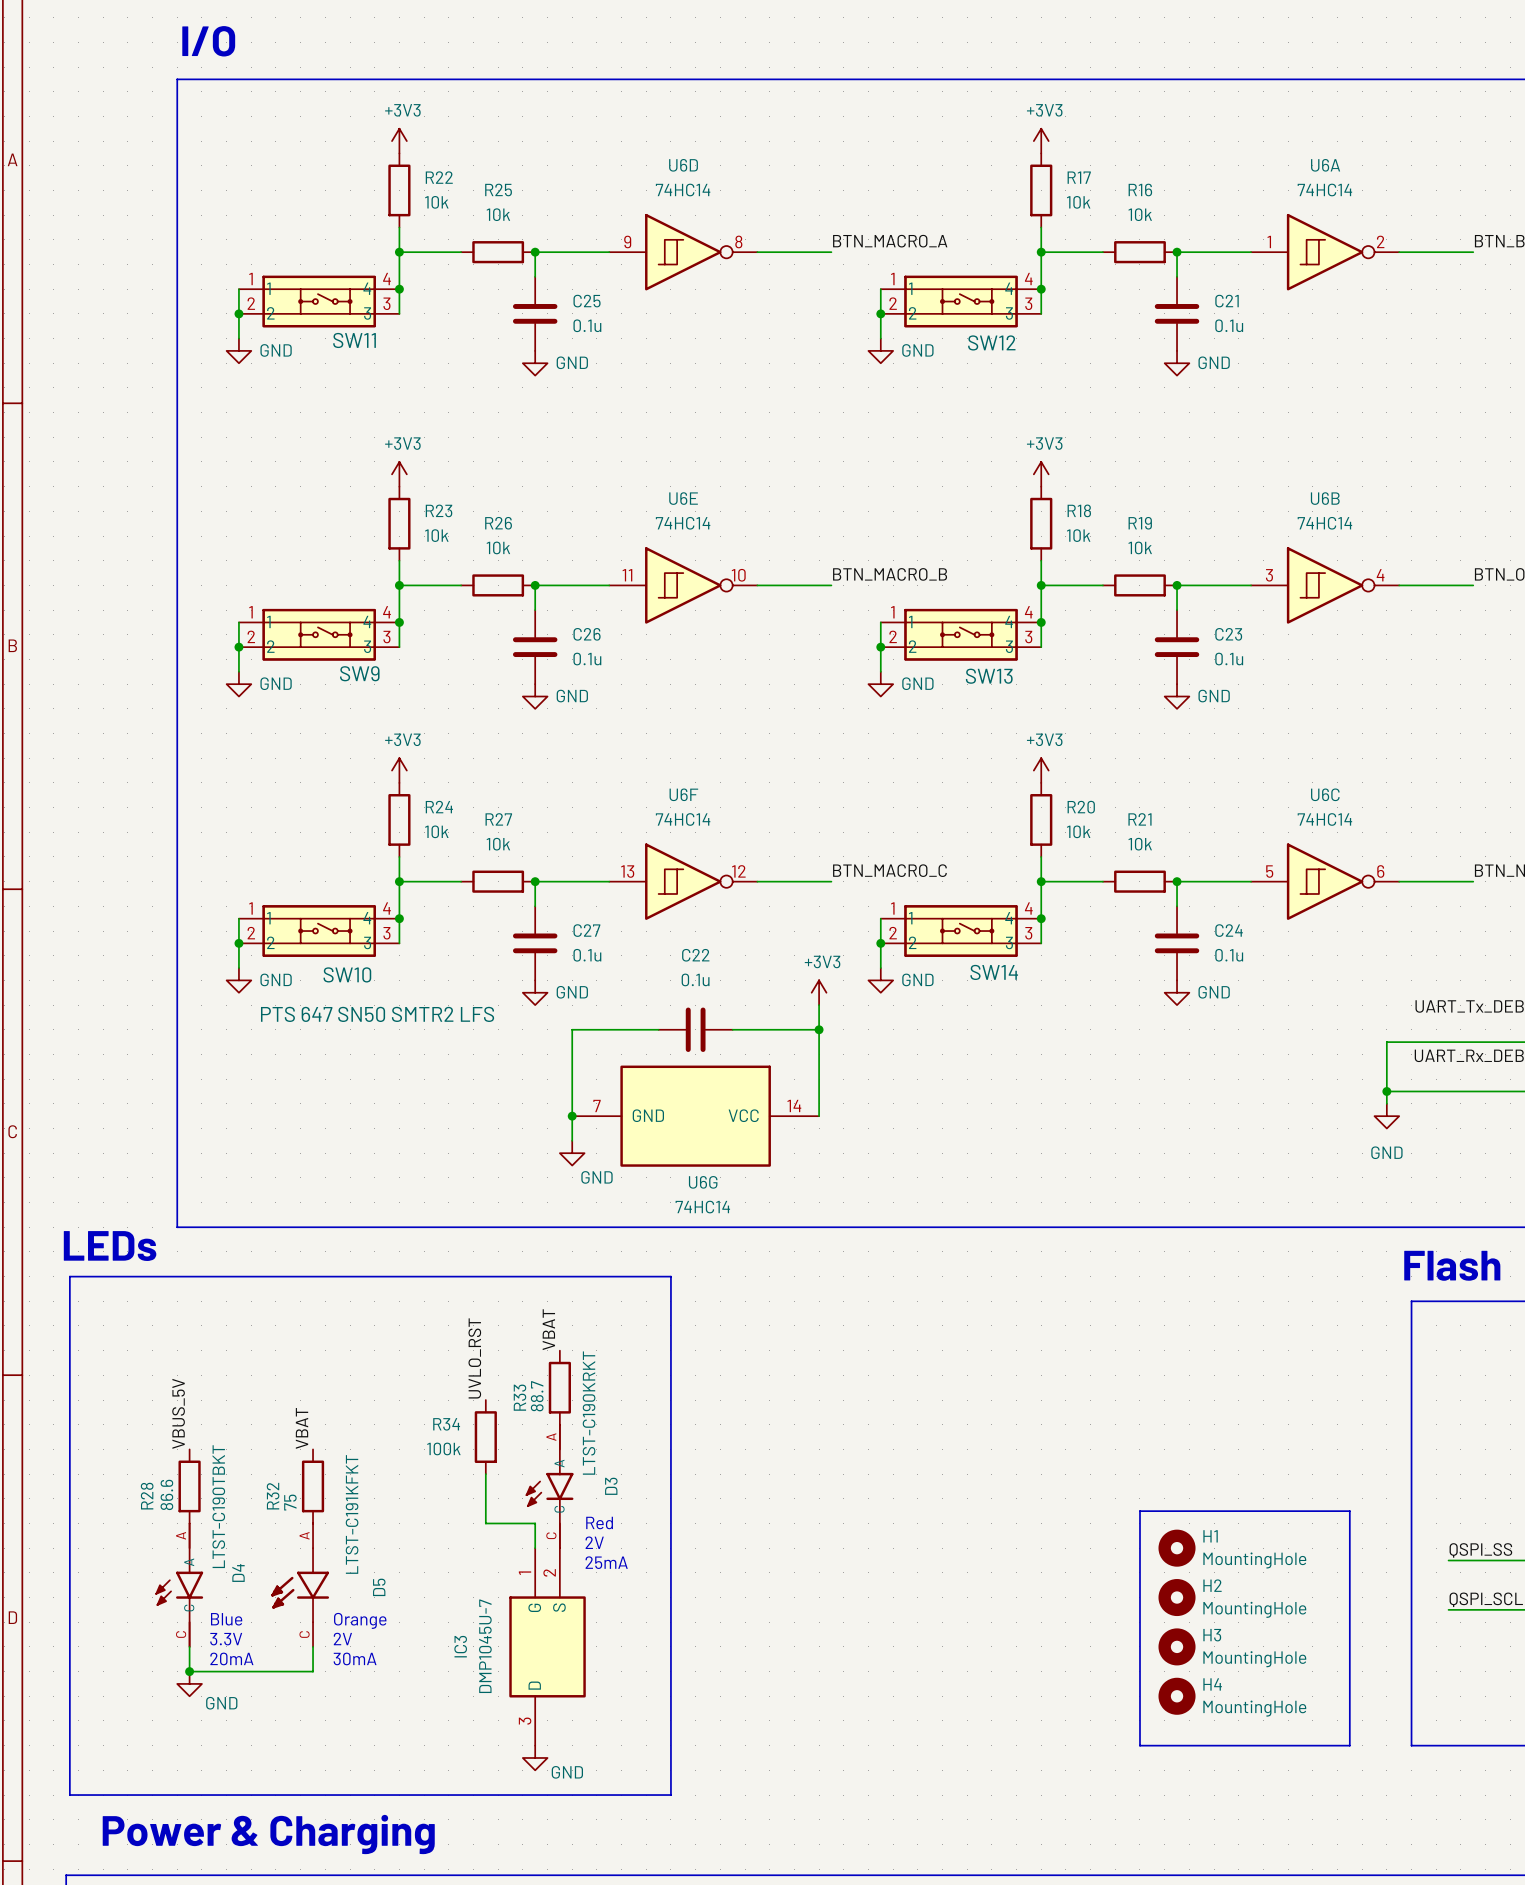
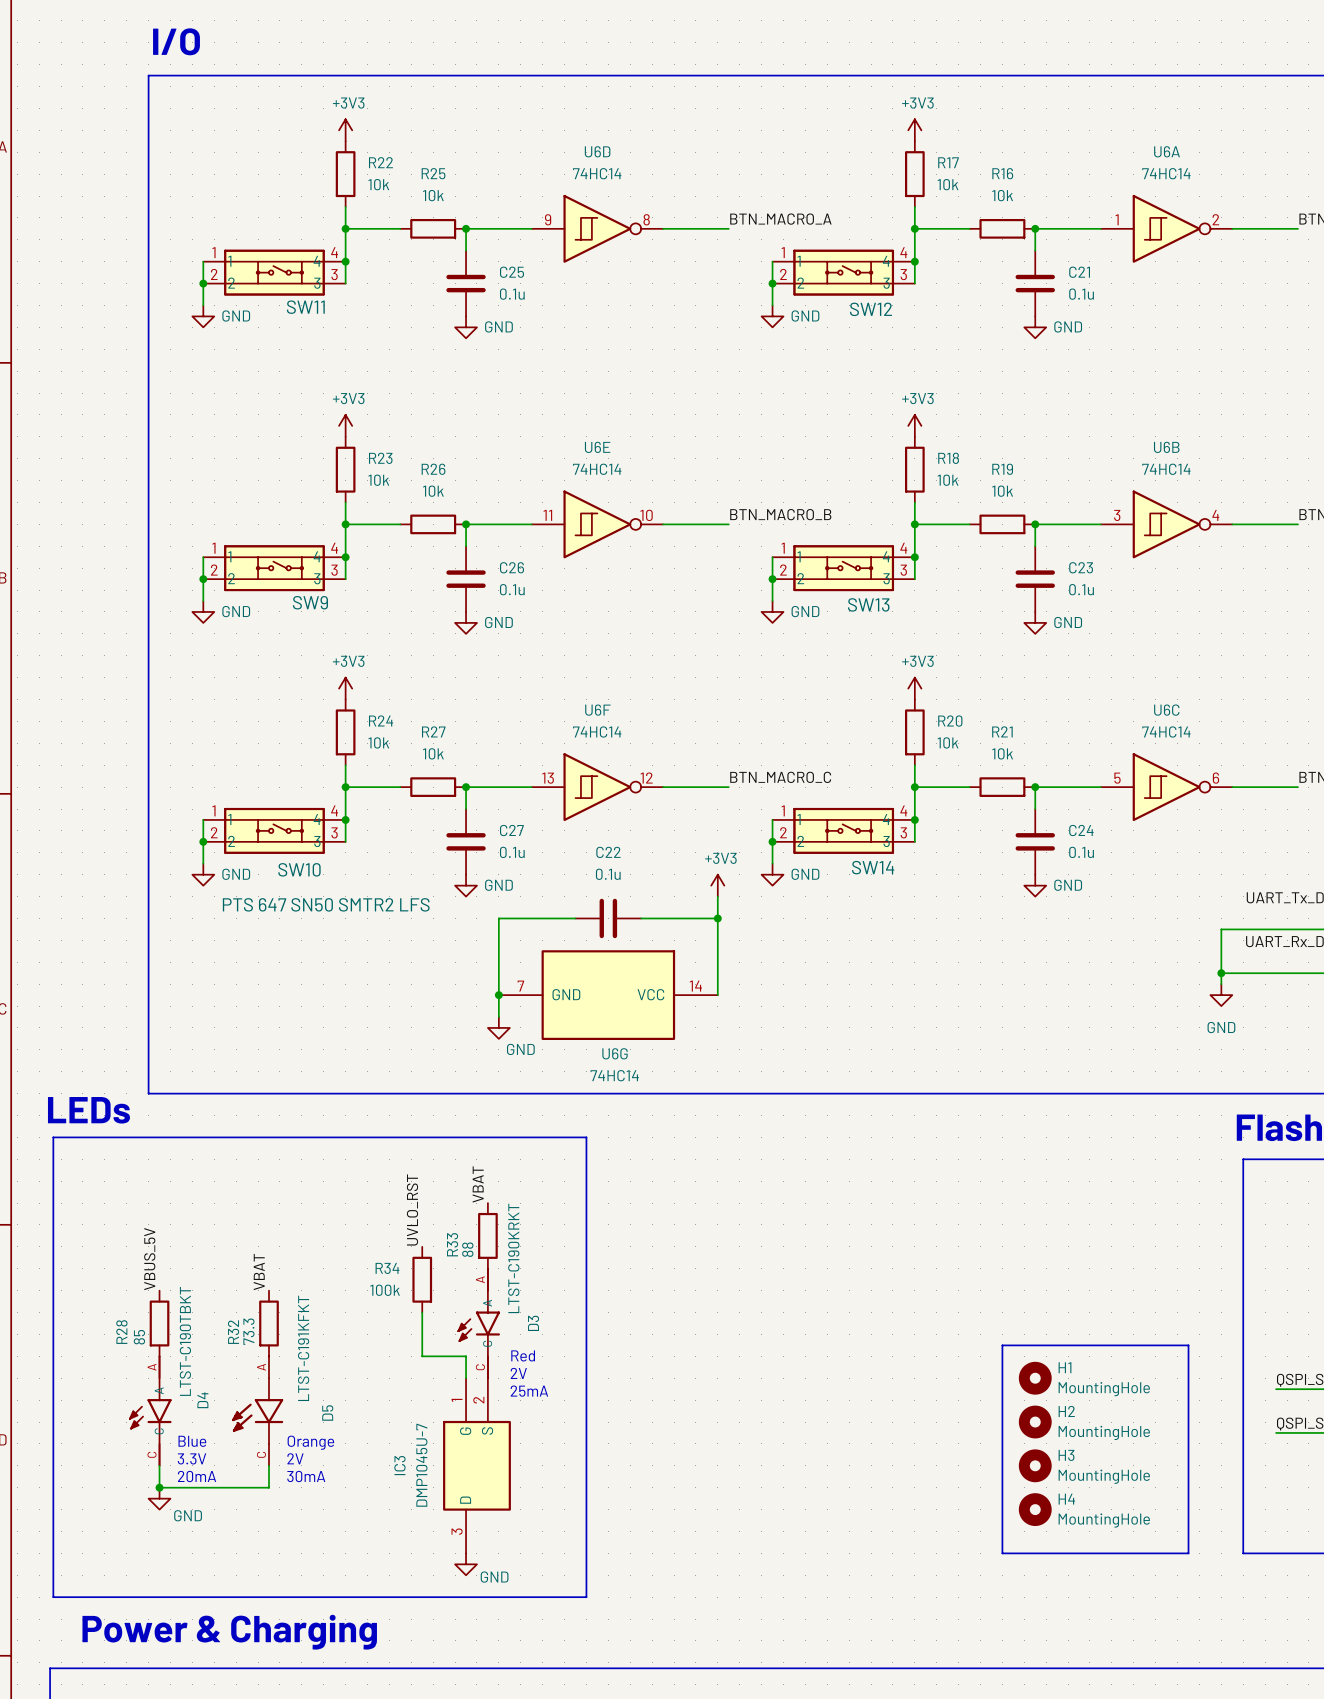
R33 value: 88.7 (537, 1396) -> 88 (467, 1249)
R28 value: 86.6 (166, 1494) -> 85 (139, 1337)
R32 value: 75 (290, 1502) -> 73.3 (248, 1331)

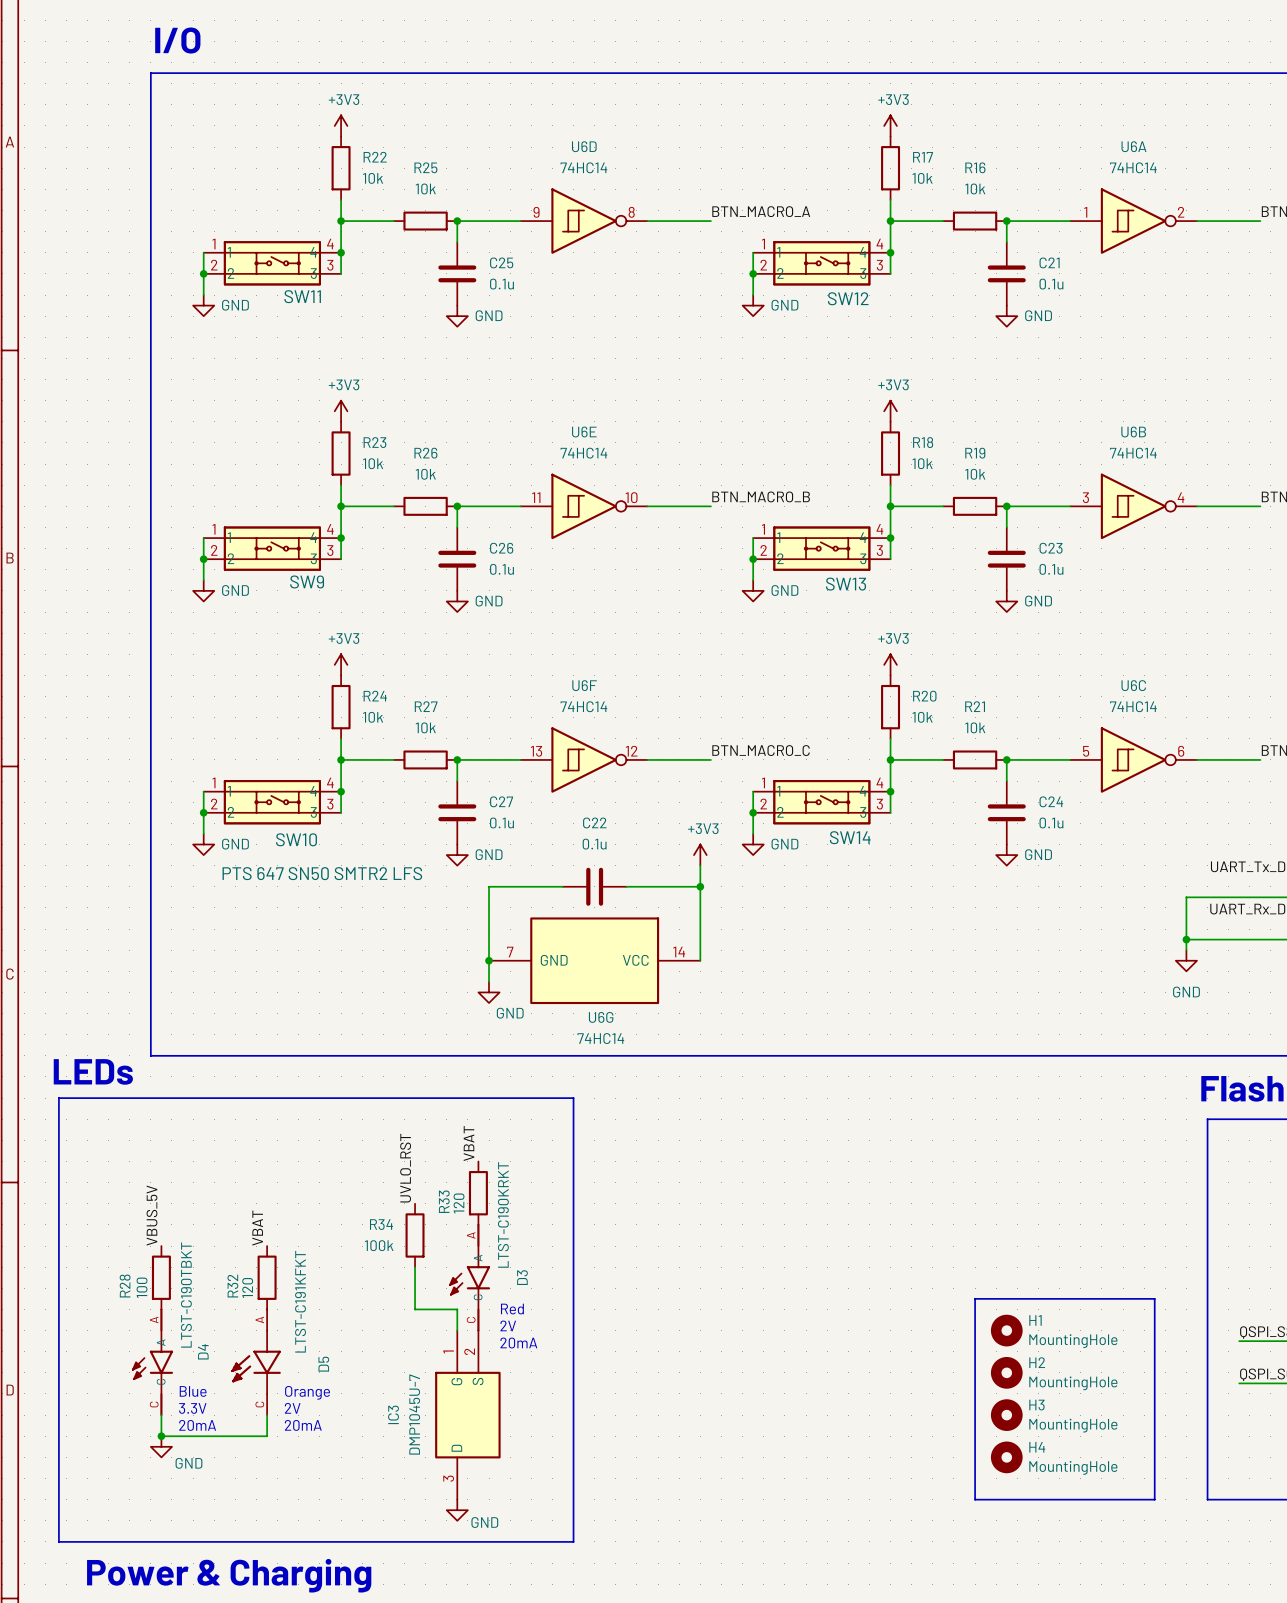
R33 value: 88 (467, 1249) -> 120 (459, 1203)
R32 value: 73.3 (248, 1331) -> 120 (247, 1288)
R28 value: 85 (139, 1337) -> 100 (142, 1287)
text: 25mA (529, 1391) -> 20mA (518, 1343)
text: 30mA (306, 1476) -> 20mA (303, 1425)

